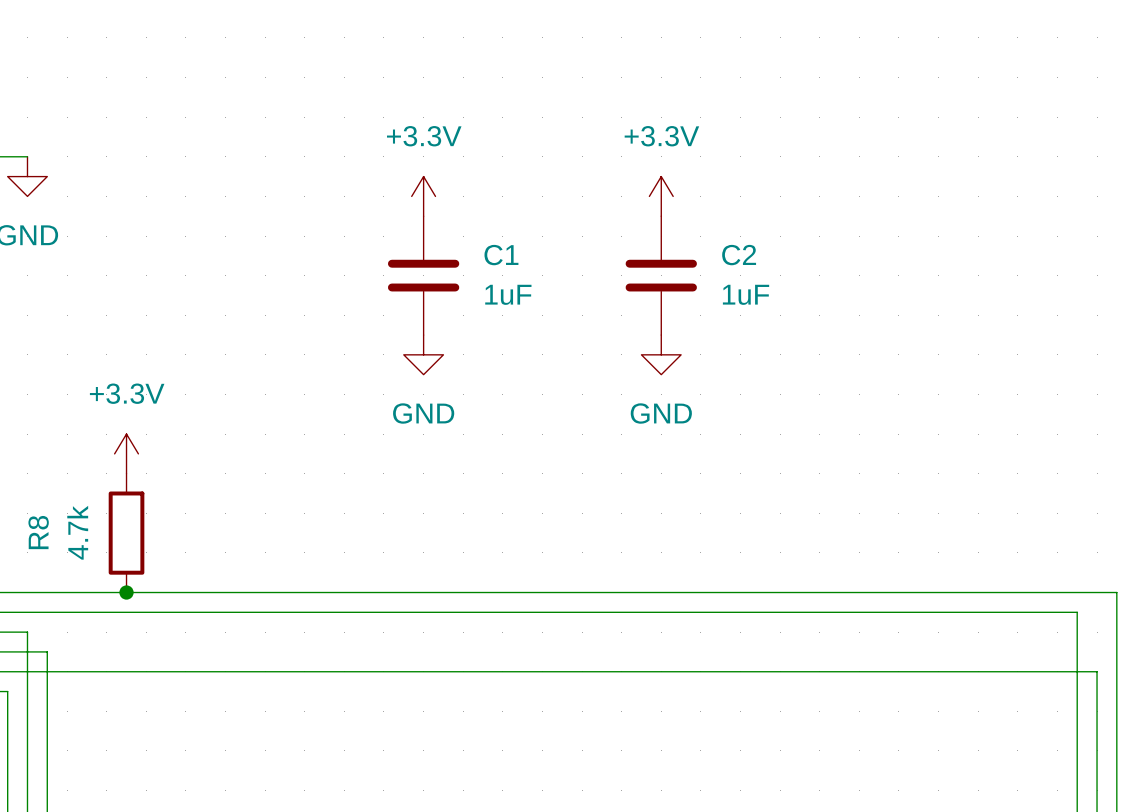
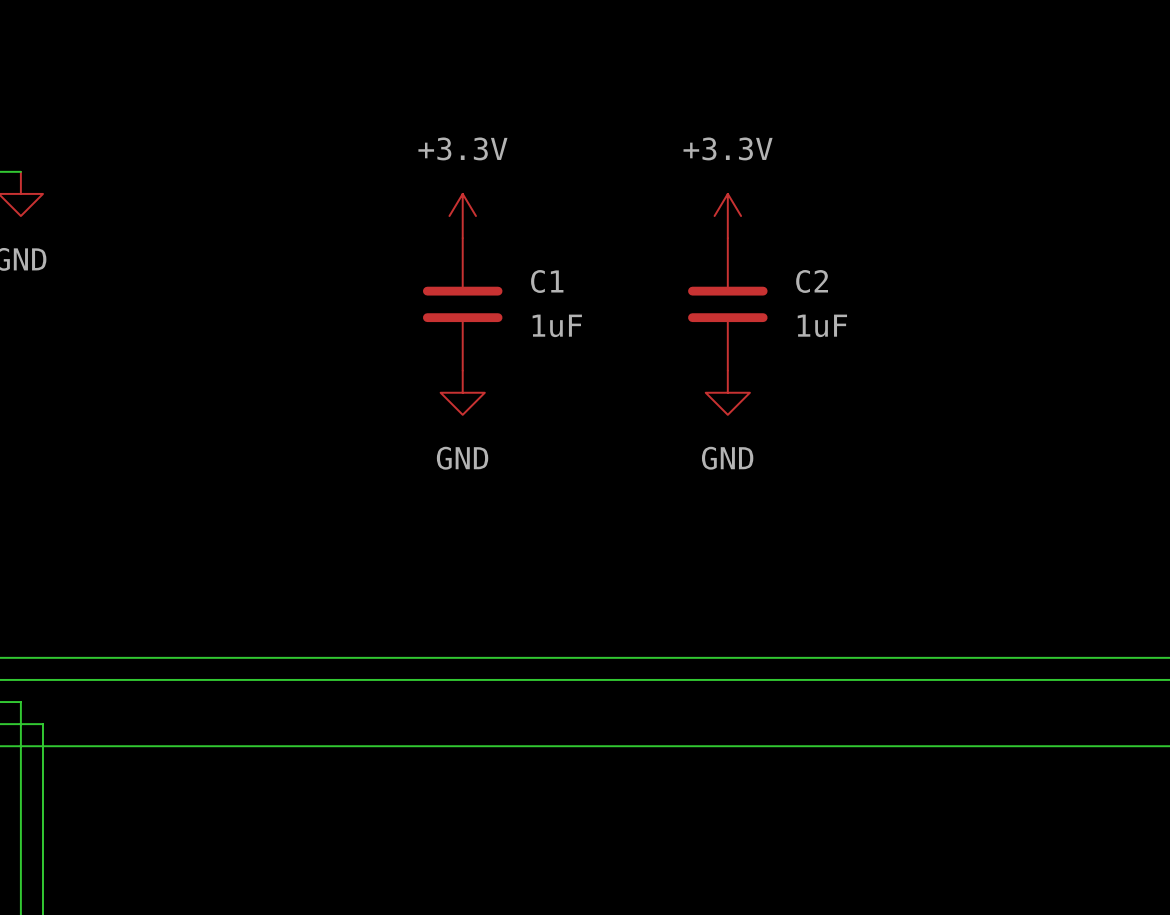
power symbol: +3.3V (126, 453) -> none
R8: 4.7k (126, 533) -> none
junction: (126, 592) -> none

